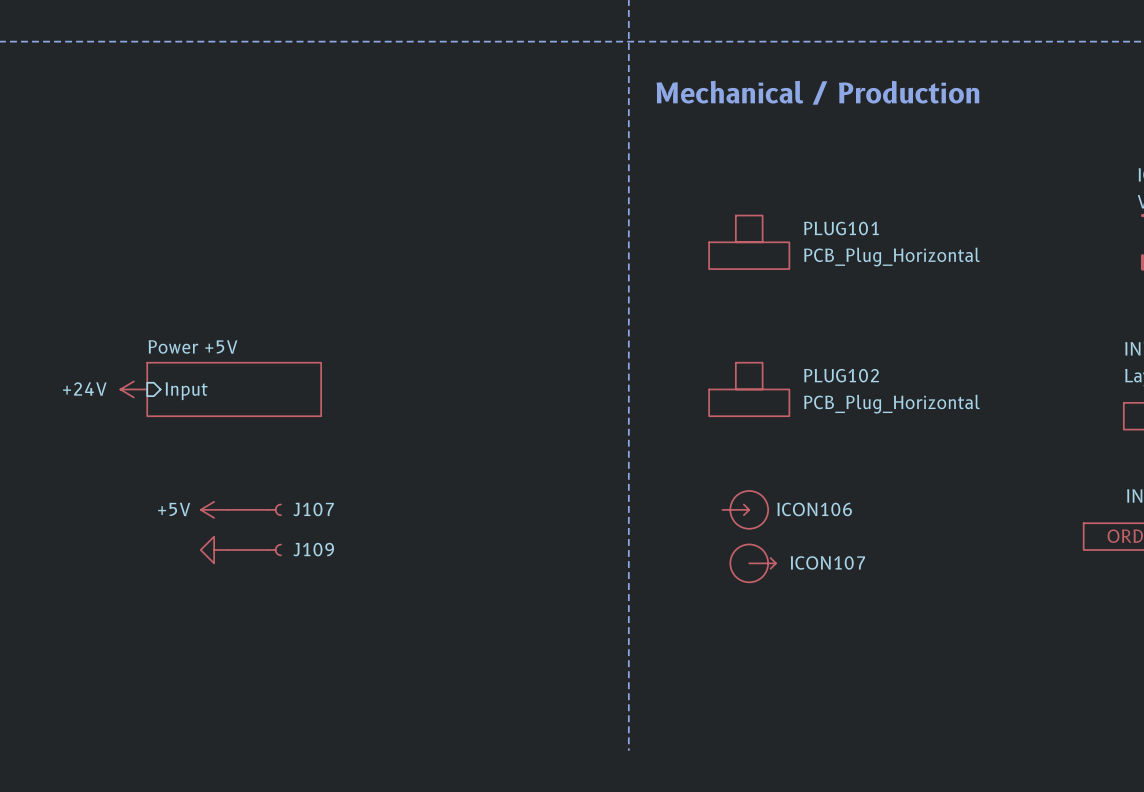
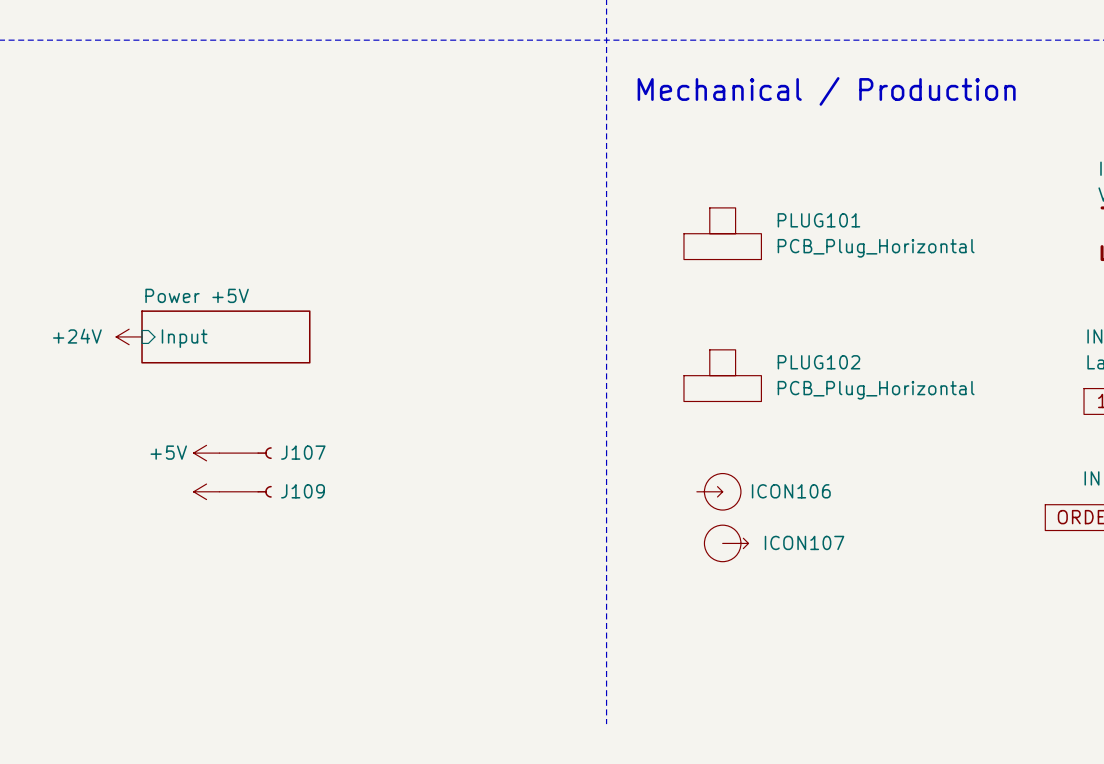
power symbol position: +24V (133, 389) -> +24V (129, 336)
sheet Power +5V position: (234, 389) -> (225, 336)
sheet pin position: Input (186, 391) -> Input (184, 338)
power symbol: none -> +5V (206, 453)
J107: none -> (245, 453)
power symbol text: +5V (174, 509) -> none
J107 name: J107 (313, 509) -> J109 (303, 491)
power symbol: (214, 550) -> none
J109: (254, 550) -> none

